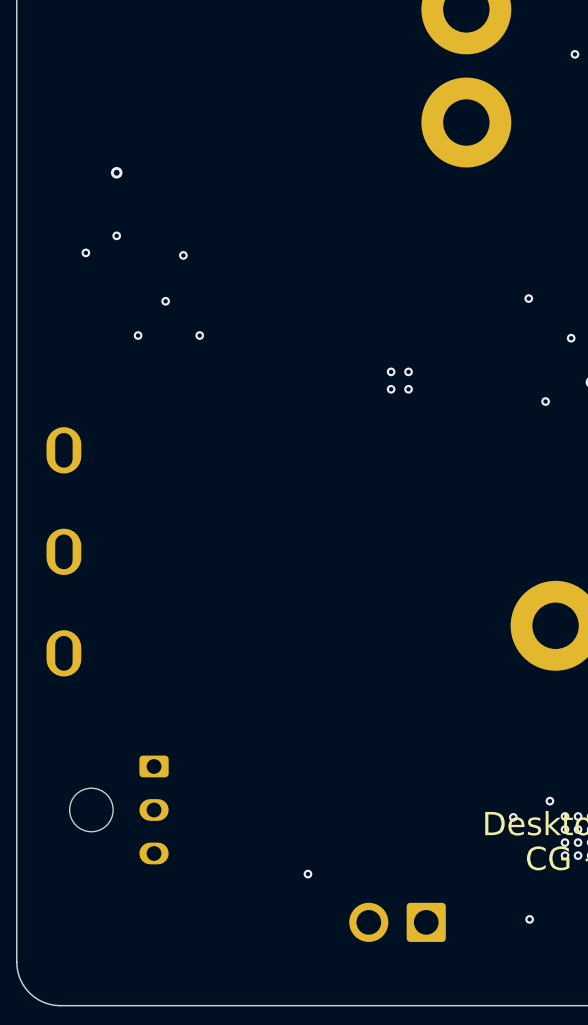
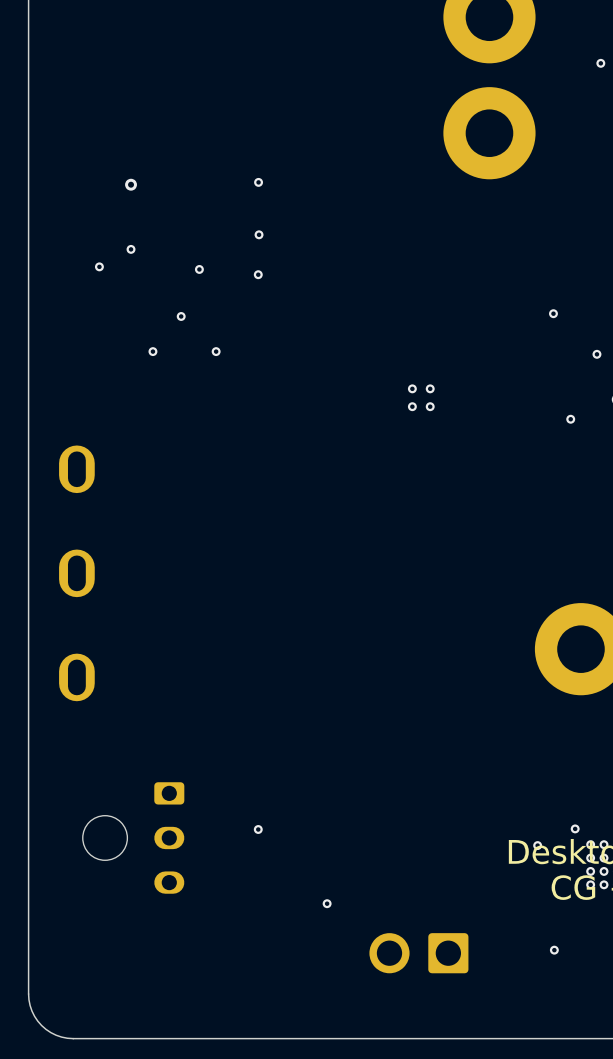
via: none -> (258, 182)
via: none -> (259, 234)
via: none -> (258, 274)
via: none -> (258, 829)

